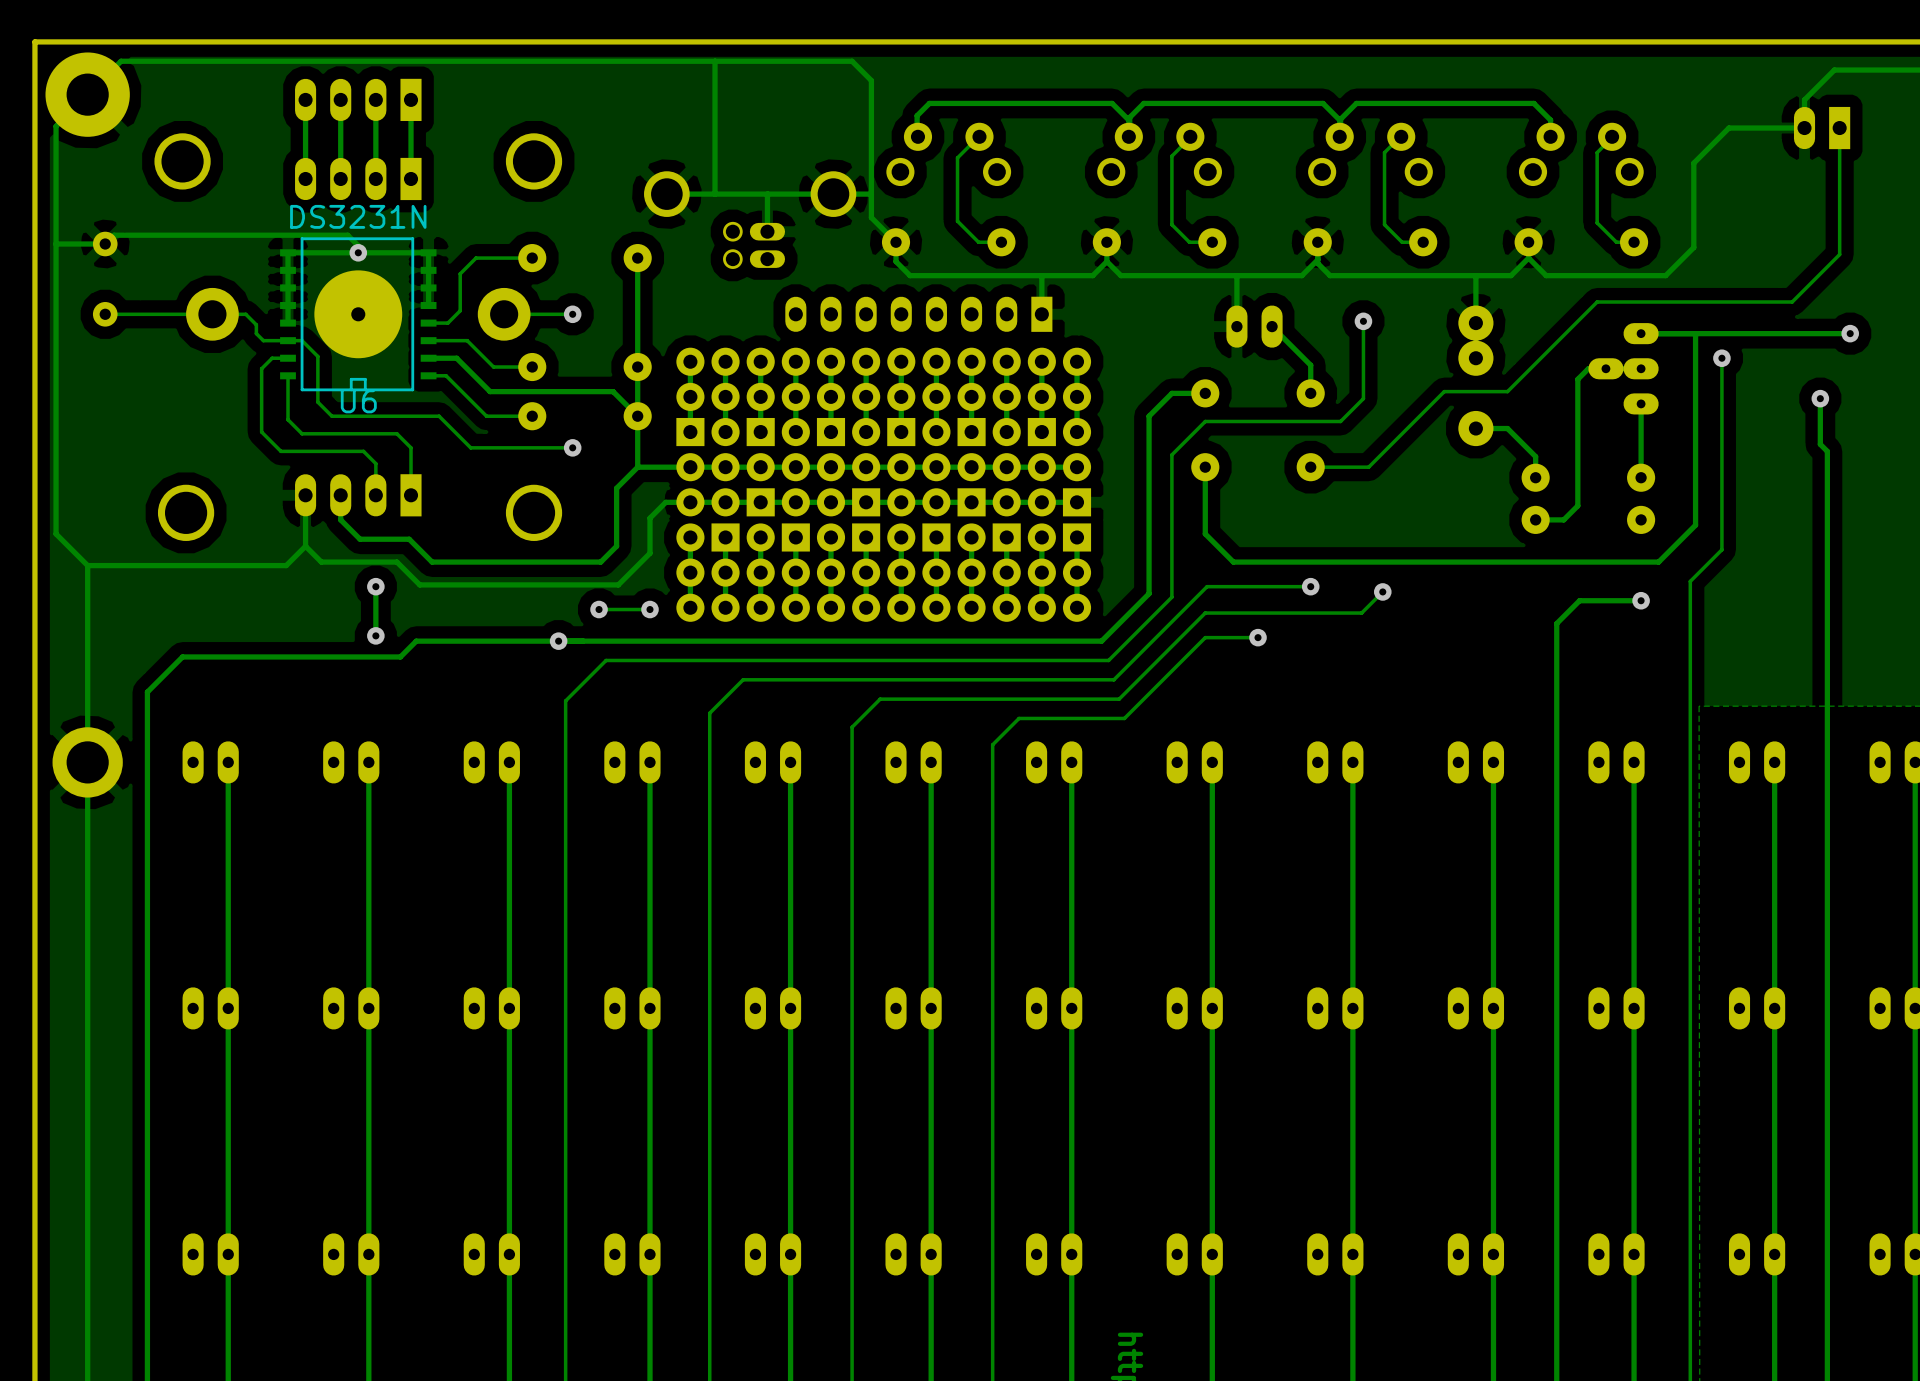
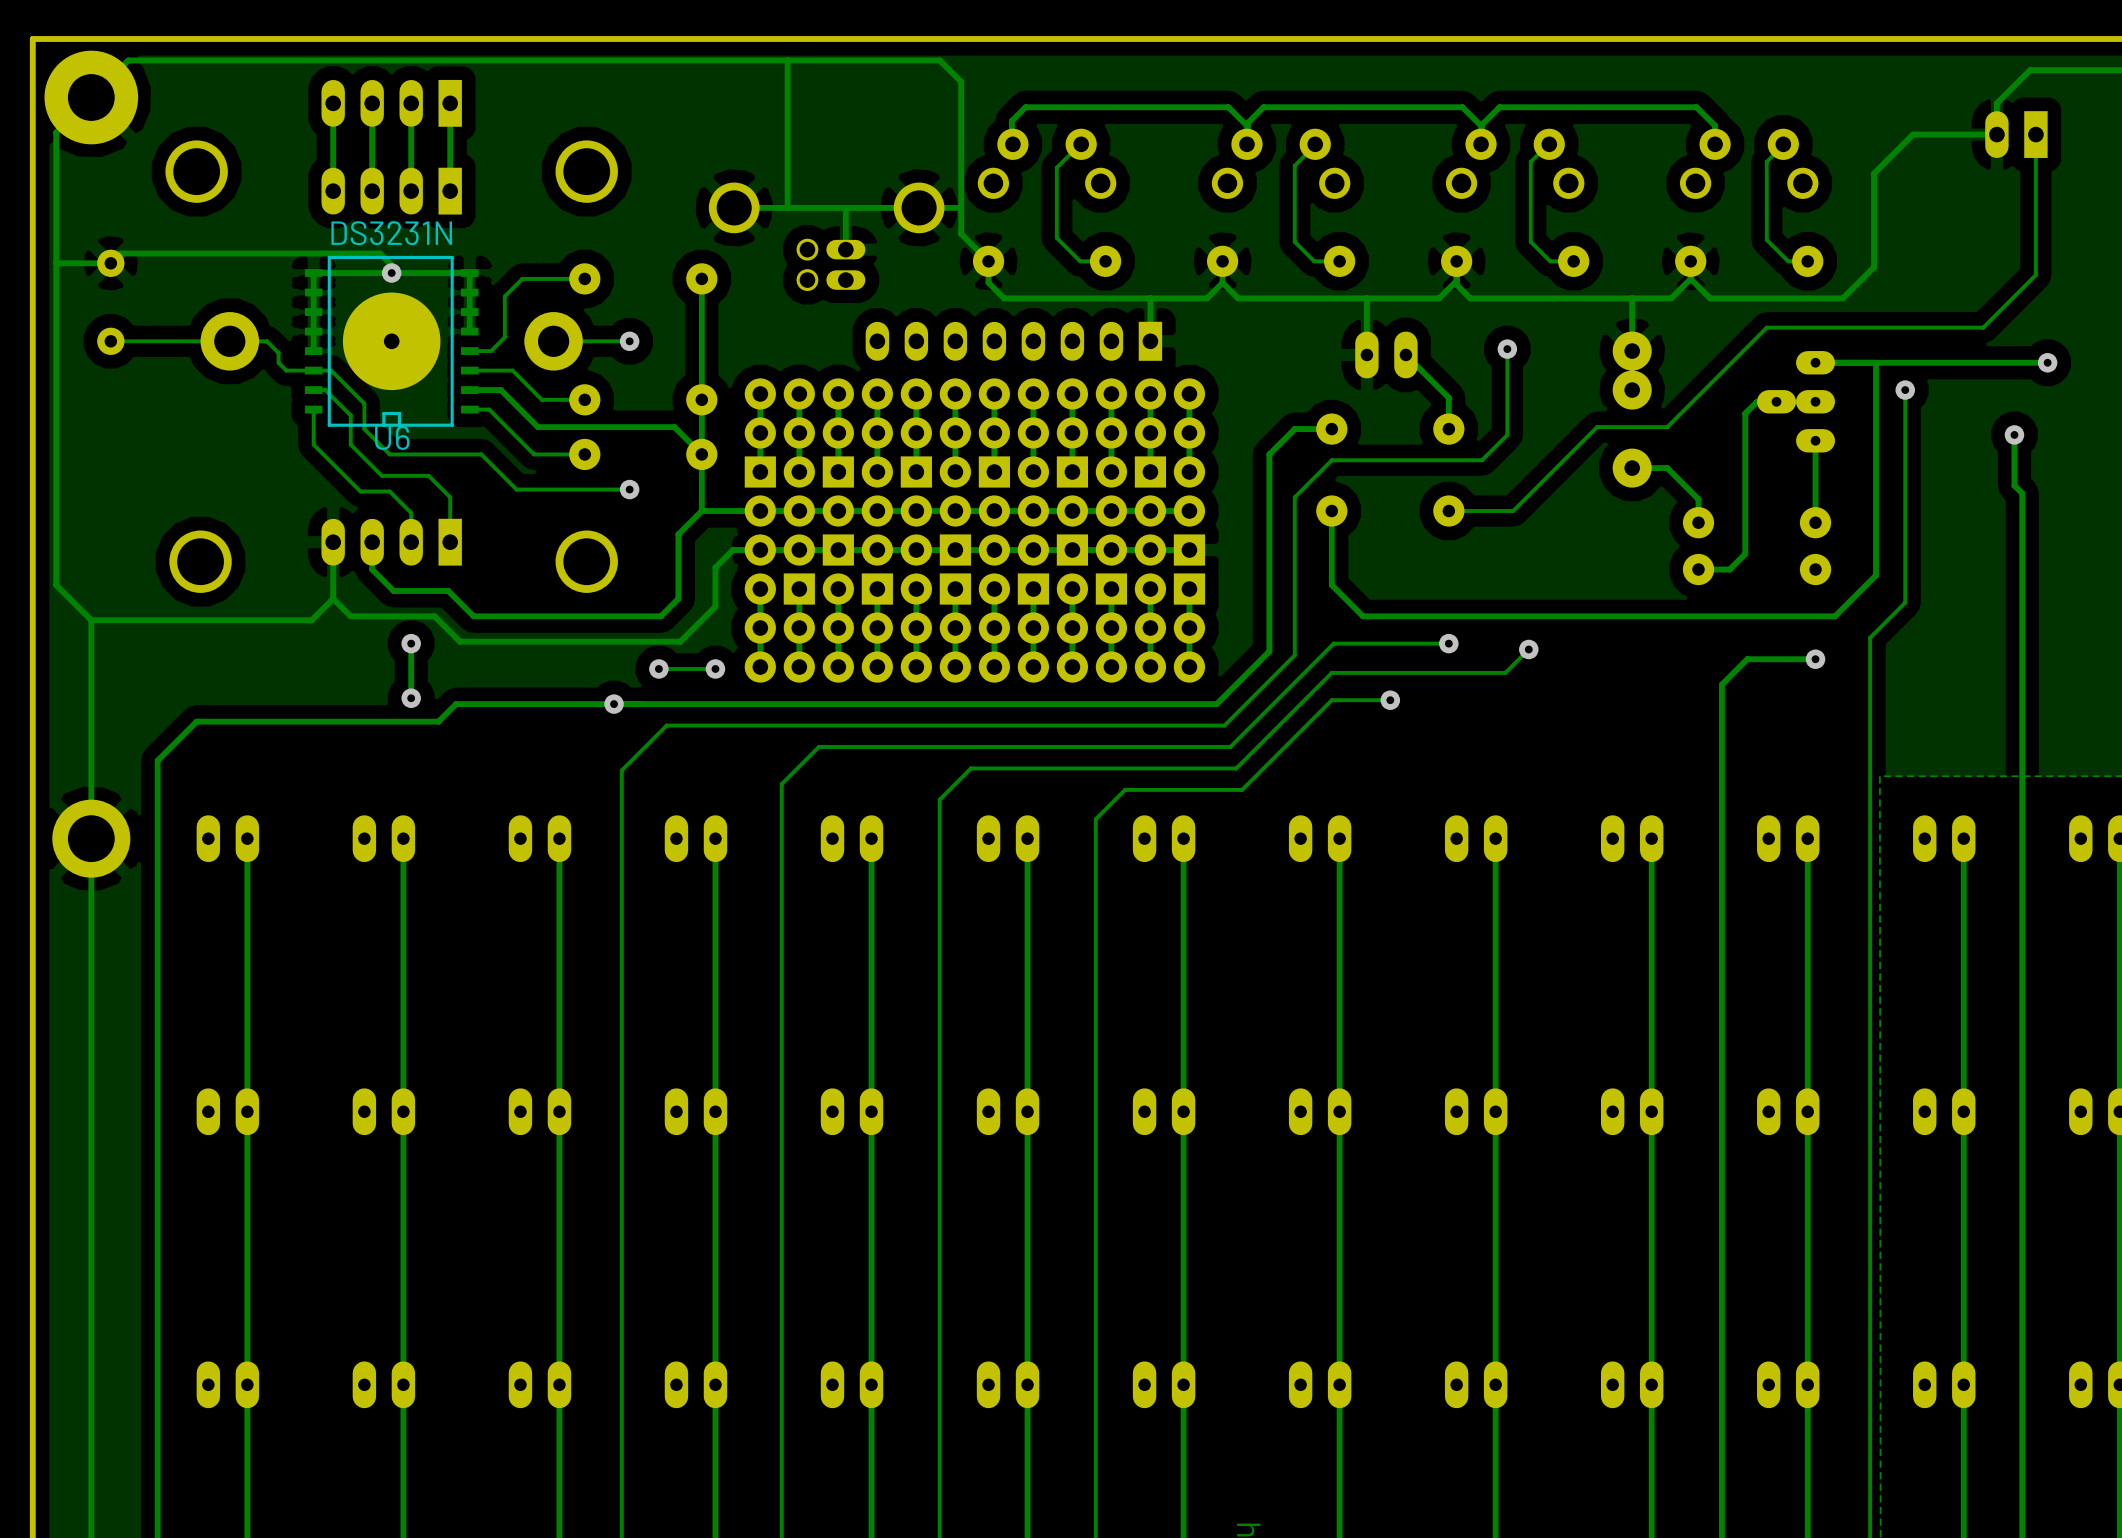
track: (302, 340) (317, 356) (317, 402) (331, 416) (356, 416) -> (329, 370) (364, 403) (364, 429) (389, 454)
track: (288, 358) (272, 358) (261, 368) (261, 432) (280, 451) (363, 451) (375, 463) (375, 468) -> (313, 390) (325, 390) (350, 415) (350, 444) (381, 475) (428, 475) (450, 497)
track: (288, 407) (288, 419) (302, 433) (396, 433) (411, 447) (411, 454) -> (313, 444) (360, 491) (389, 491) (411, 512)

